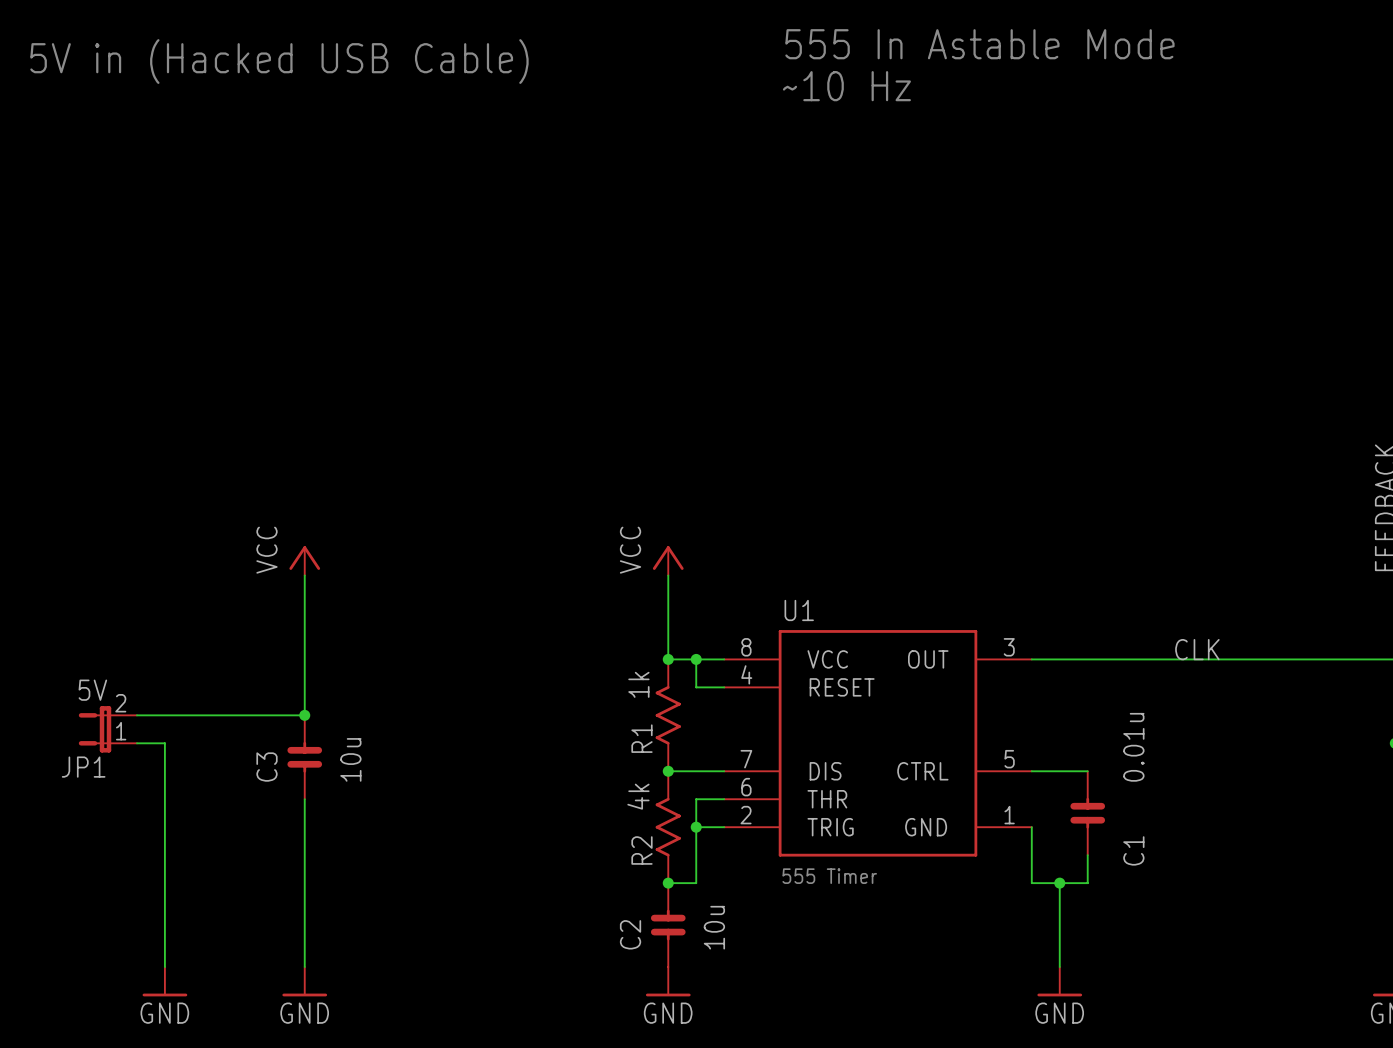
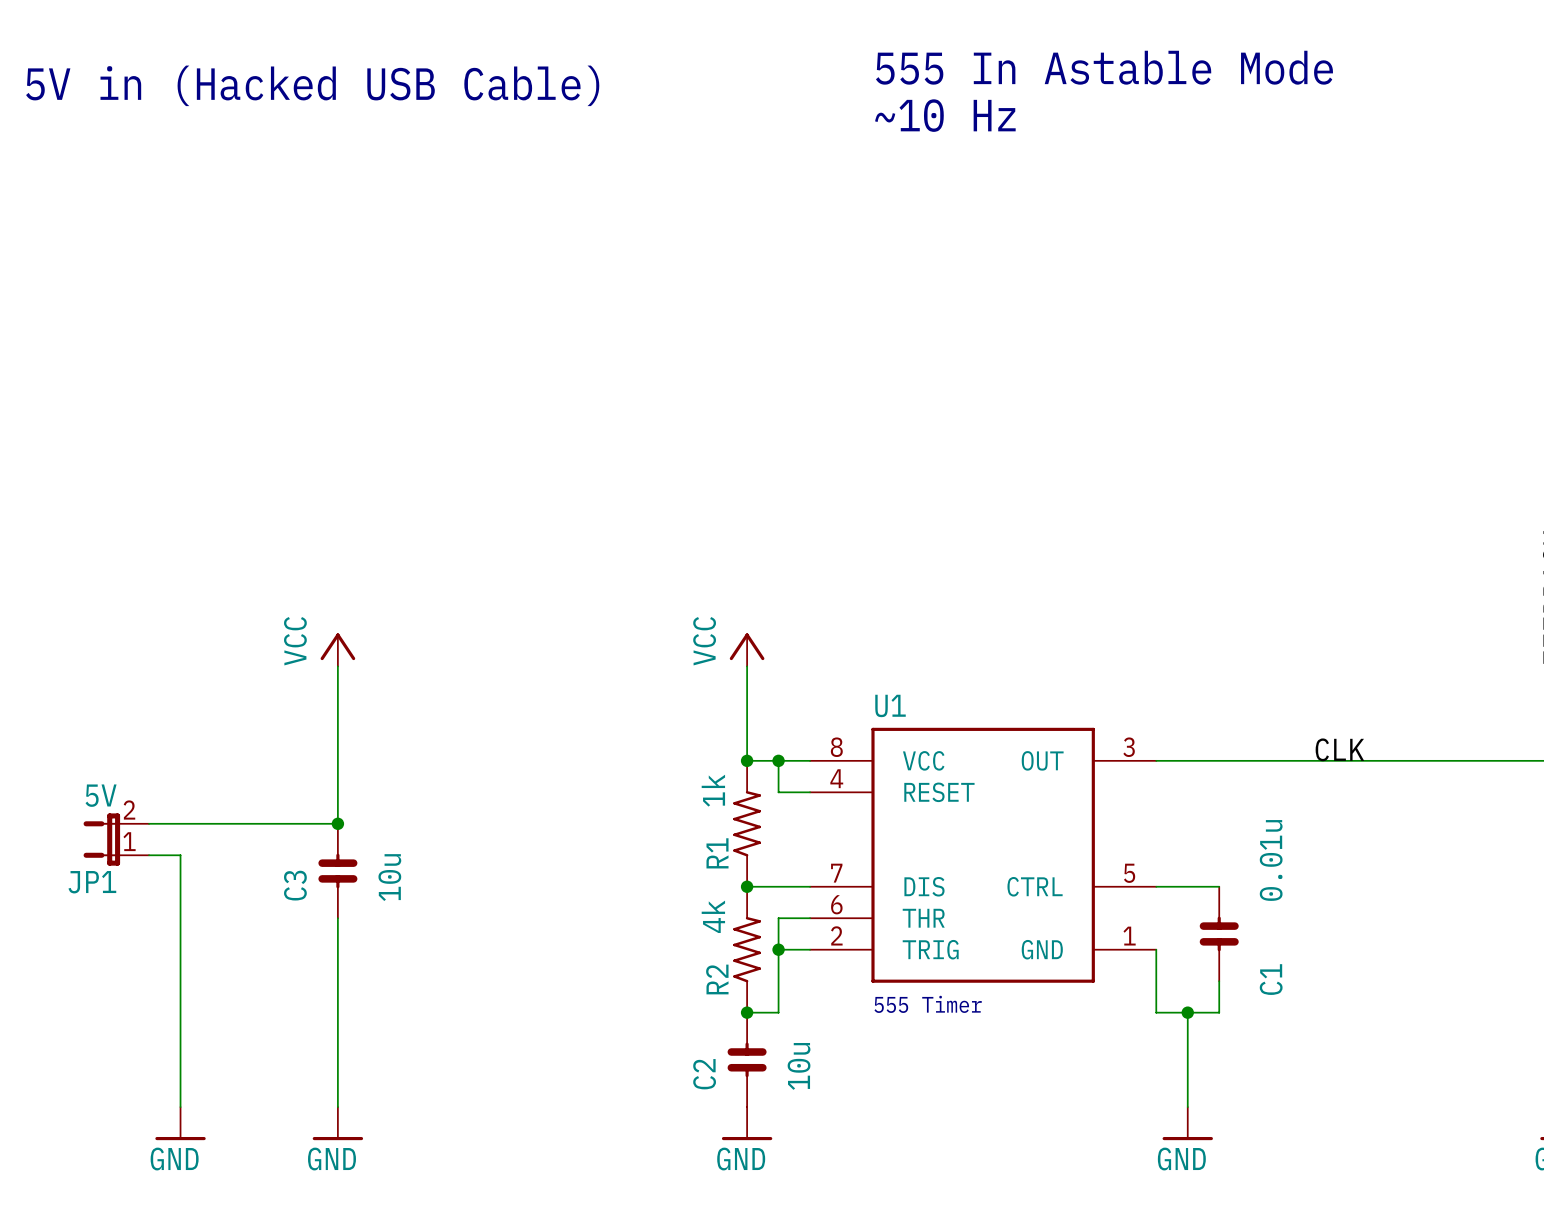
R1 symbol: [655, 659, 681, 772] -> [733, 760, 761, 887]
R2 symbol: [655, 771, 681, 884] -> [733, 886, 761, 1013]

